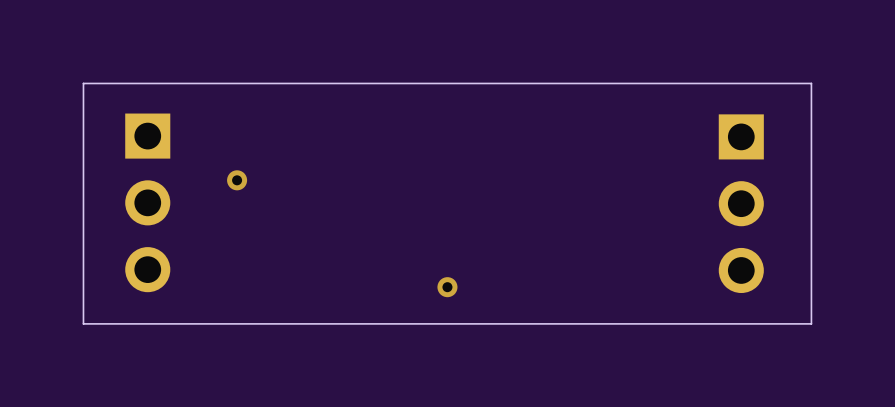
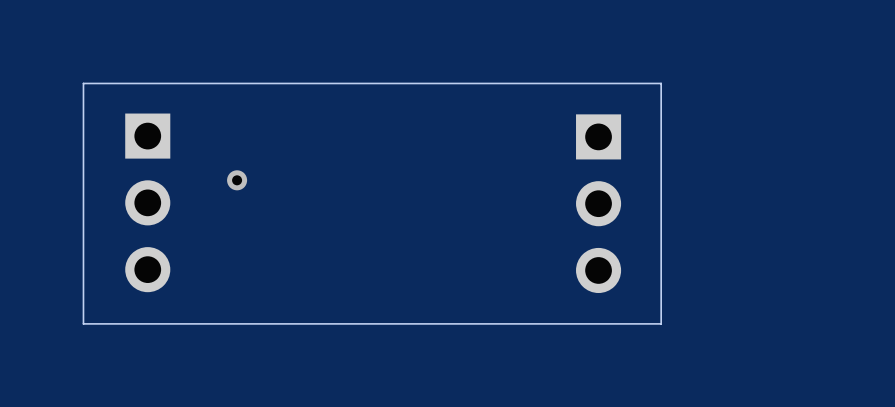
board edge: (661, 83) (811, 83) (811, 323) (661, 323) -> (661, 83) (661, 323)
part position: (741, 203) -> (598, 203)
via: (447, 287) -> none

